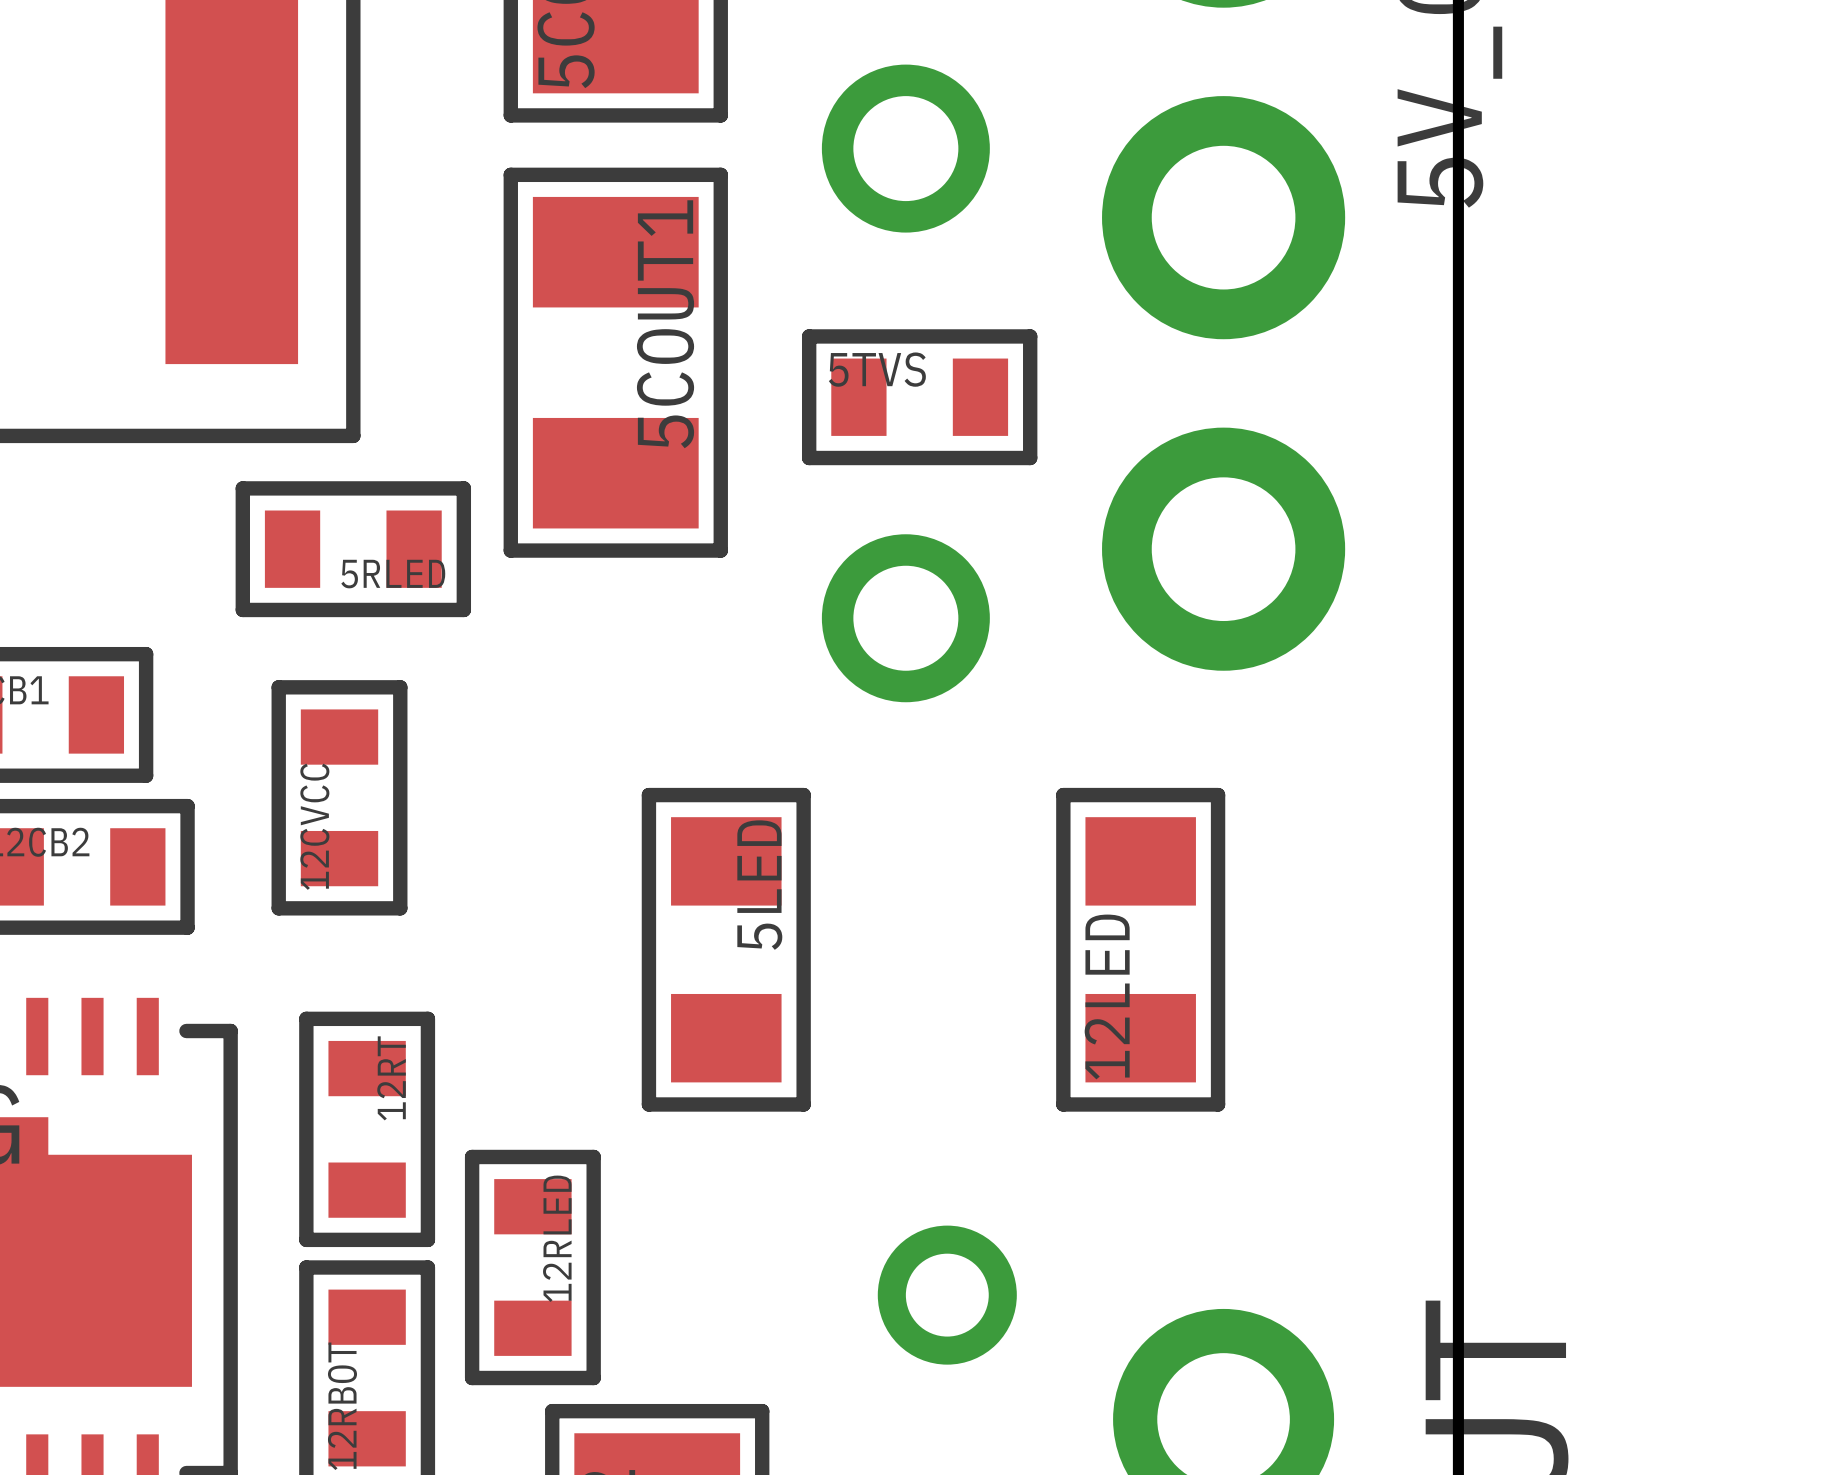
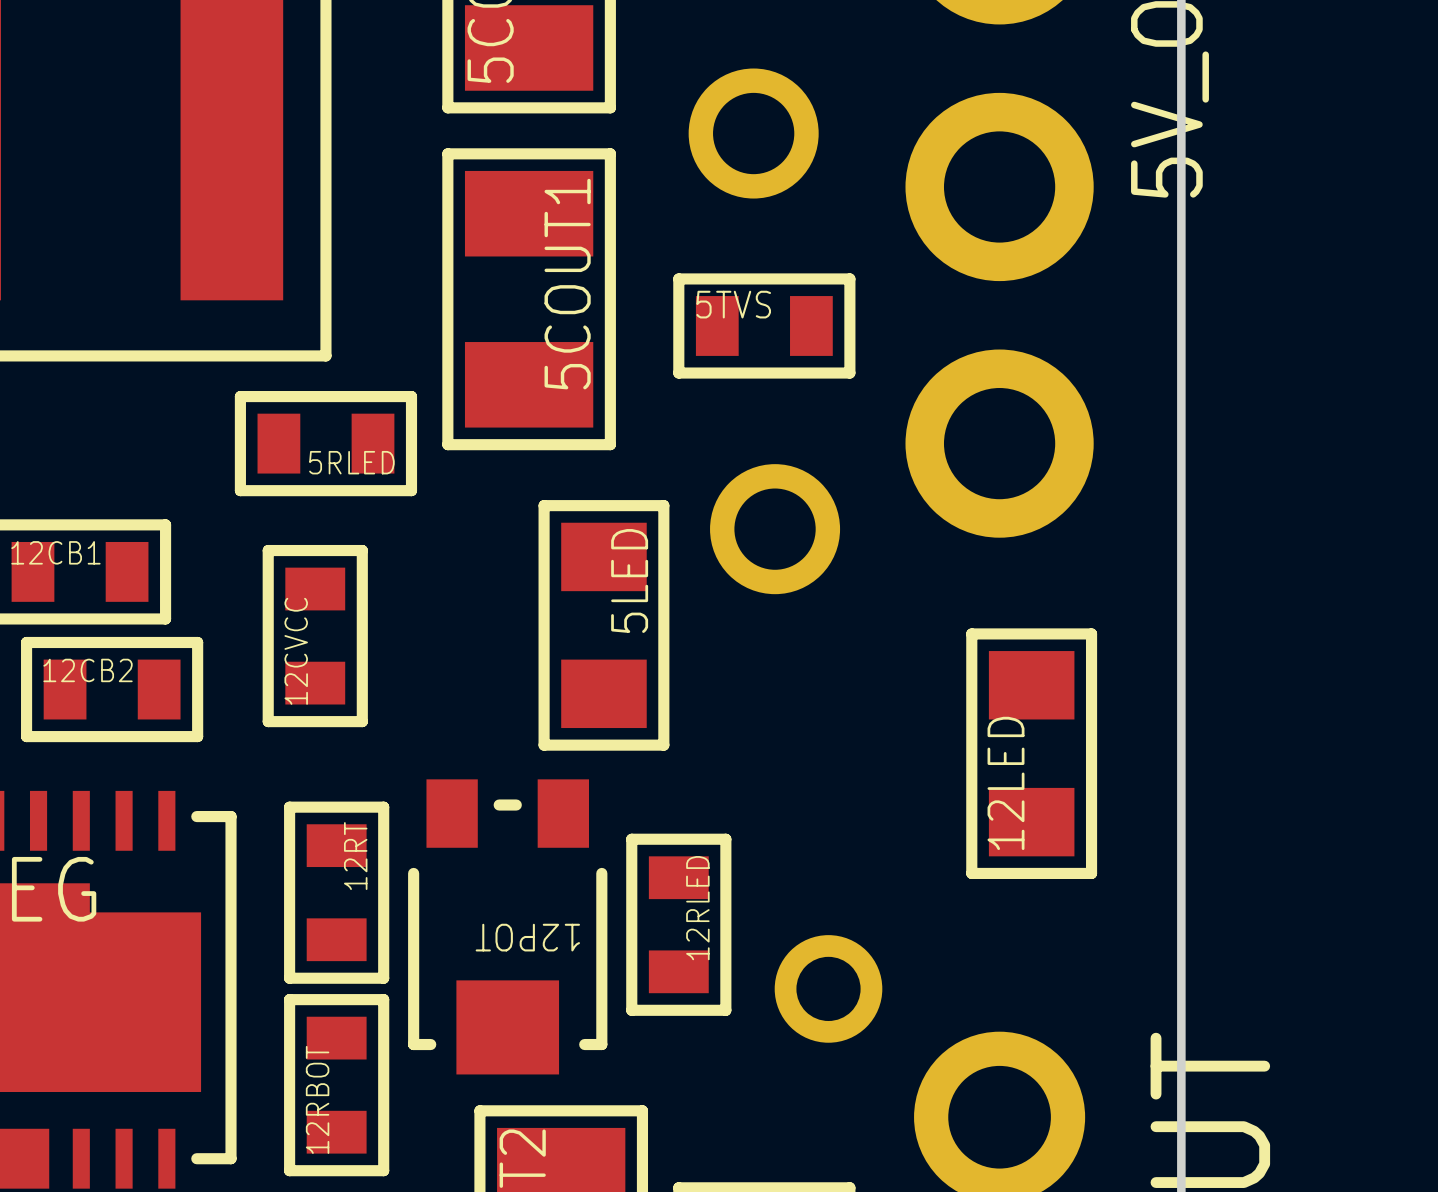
part position: (905, 618) -> (775, 529)
5LED position: (726, 949) -> (603, 625)
12LED position: (1140, 949) -> (1031, 753)
12POT: none -> (507, 926)
12RLED position: (532, 1267) -> (678, 924)
part position: (947, 1295) -> (828, 988)

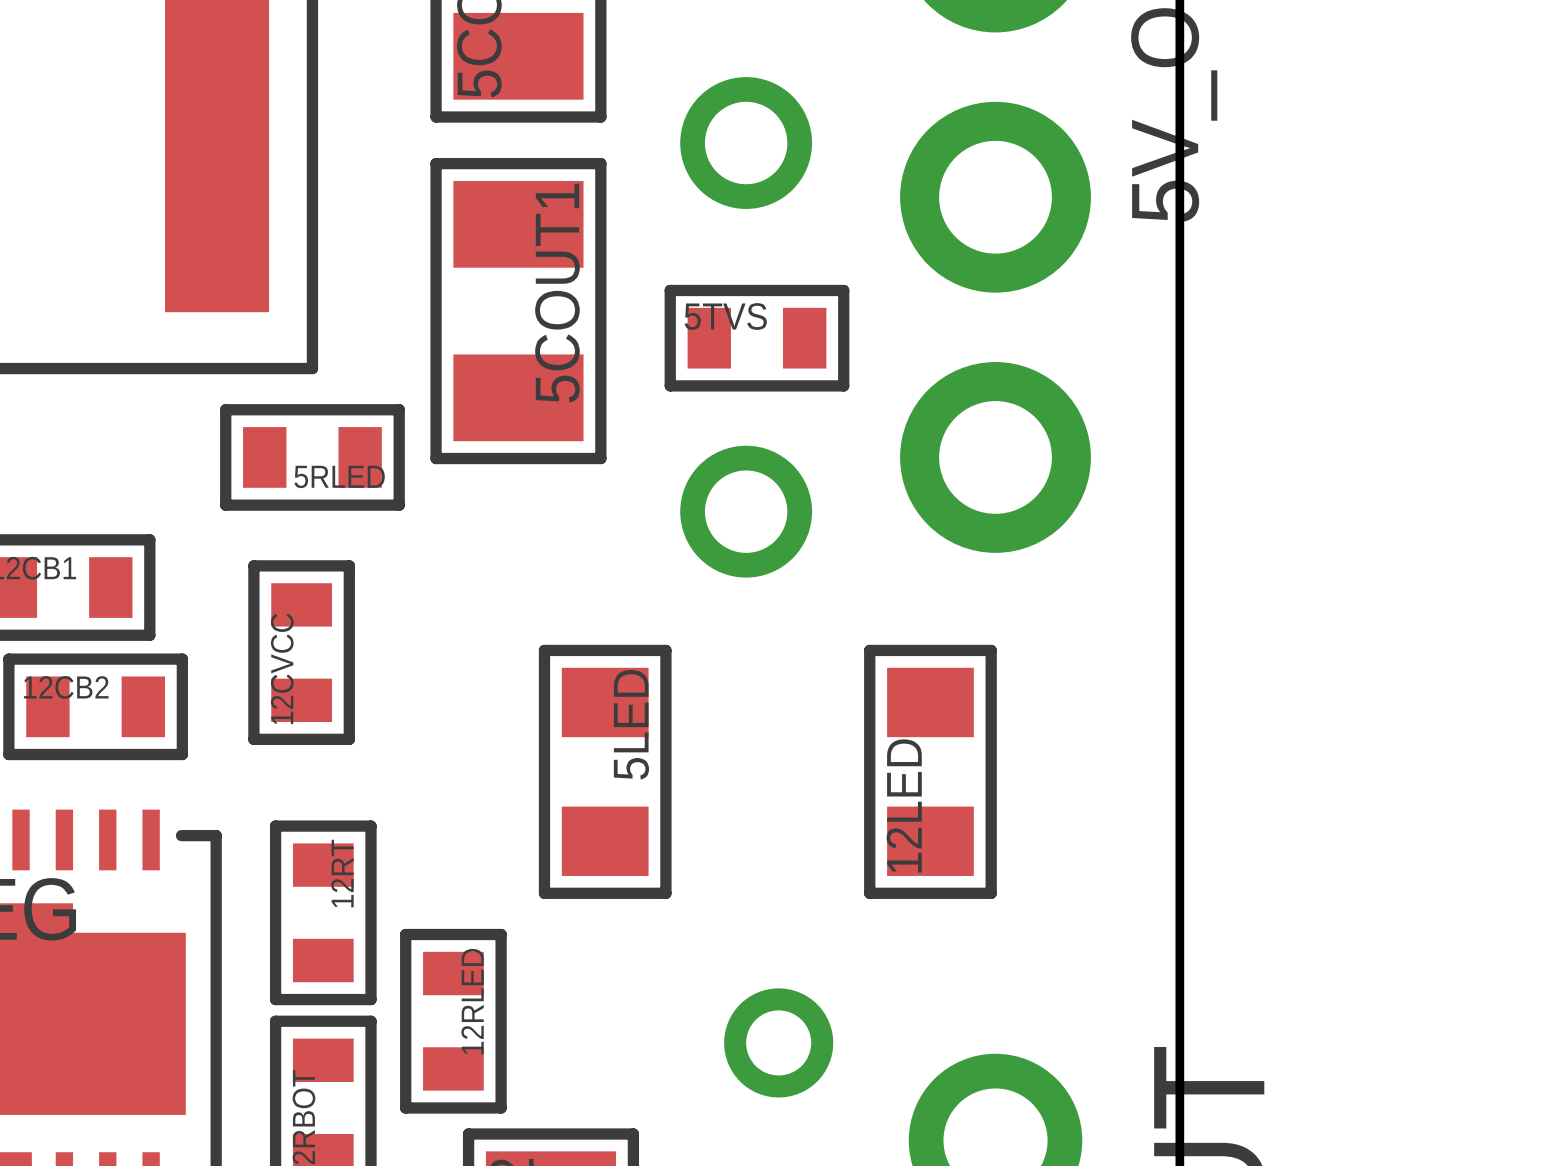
part position: (775, 529) -> (746, 511)
5LED position: (603, 625) -> (605, 771)
12LED position: (1031, 753) -> (930, 771)
12RLED position: (678, 924) -> (453, 1021)
12POT: (507, 926) -> none
part position: (828, 988) -> (778, 1042)

